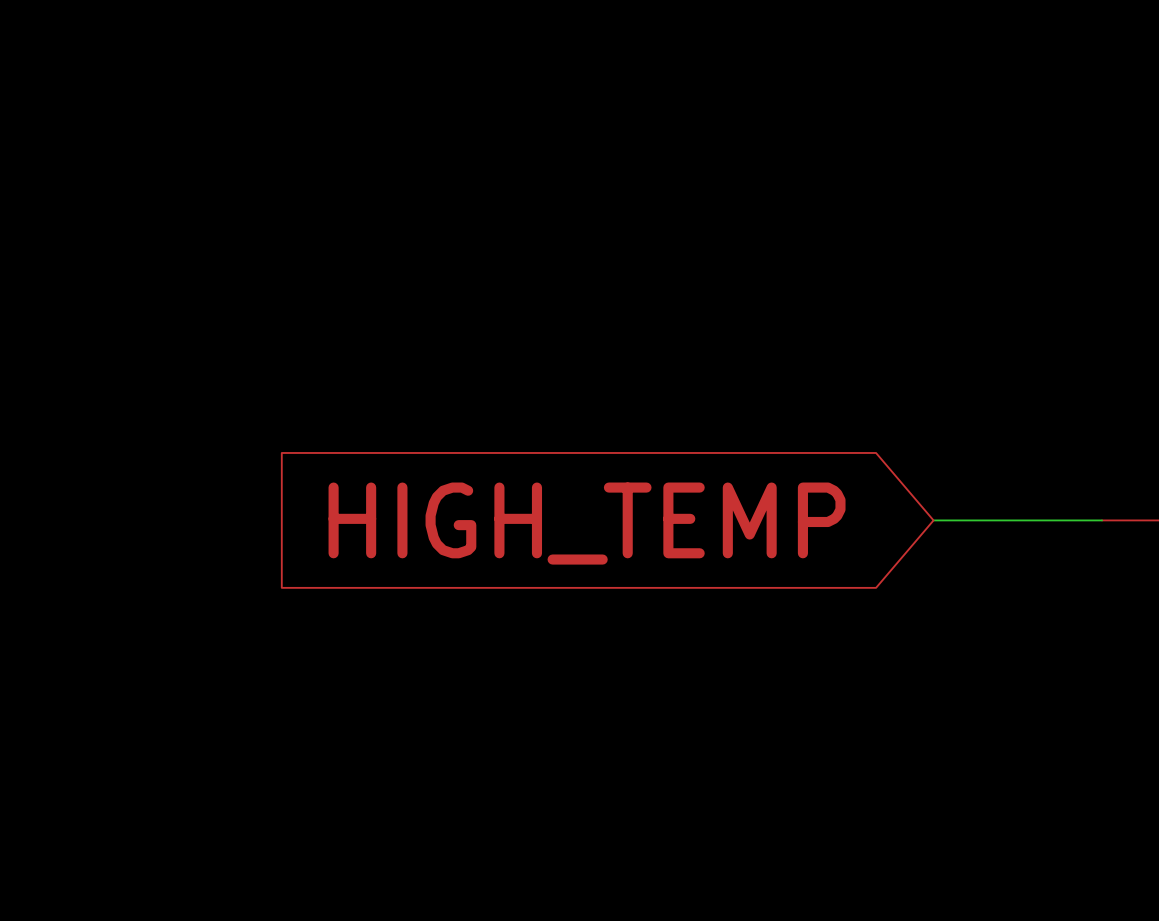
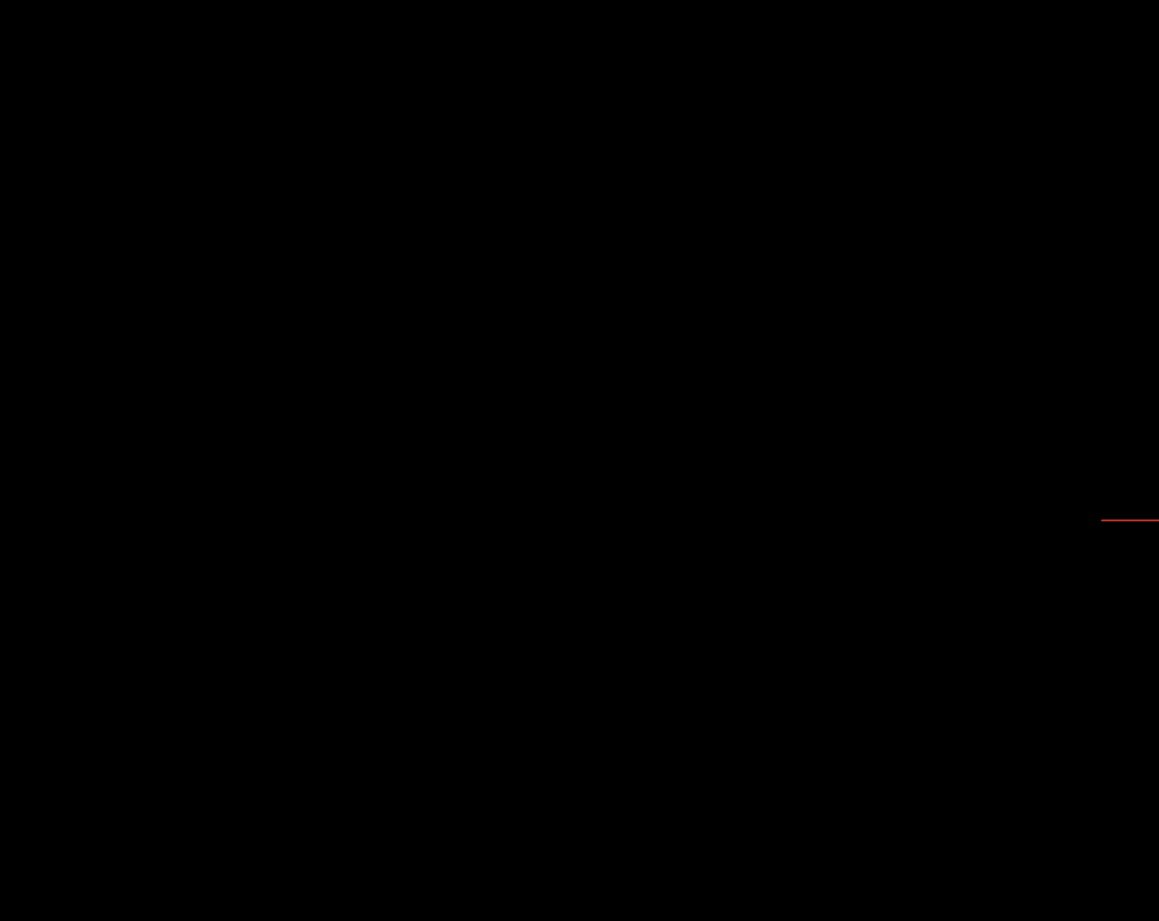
wire: (933, 520) (1102, 520) -> none
global label: HIGH_TEMP (587, 523) -> none

